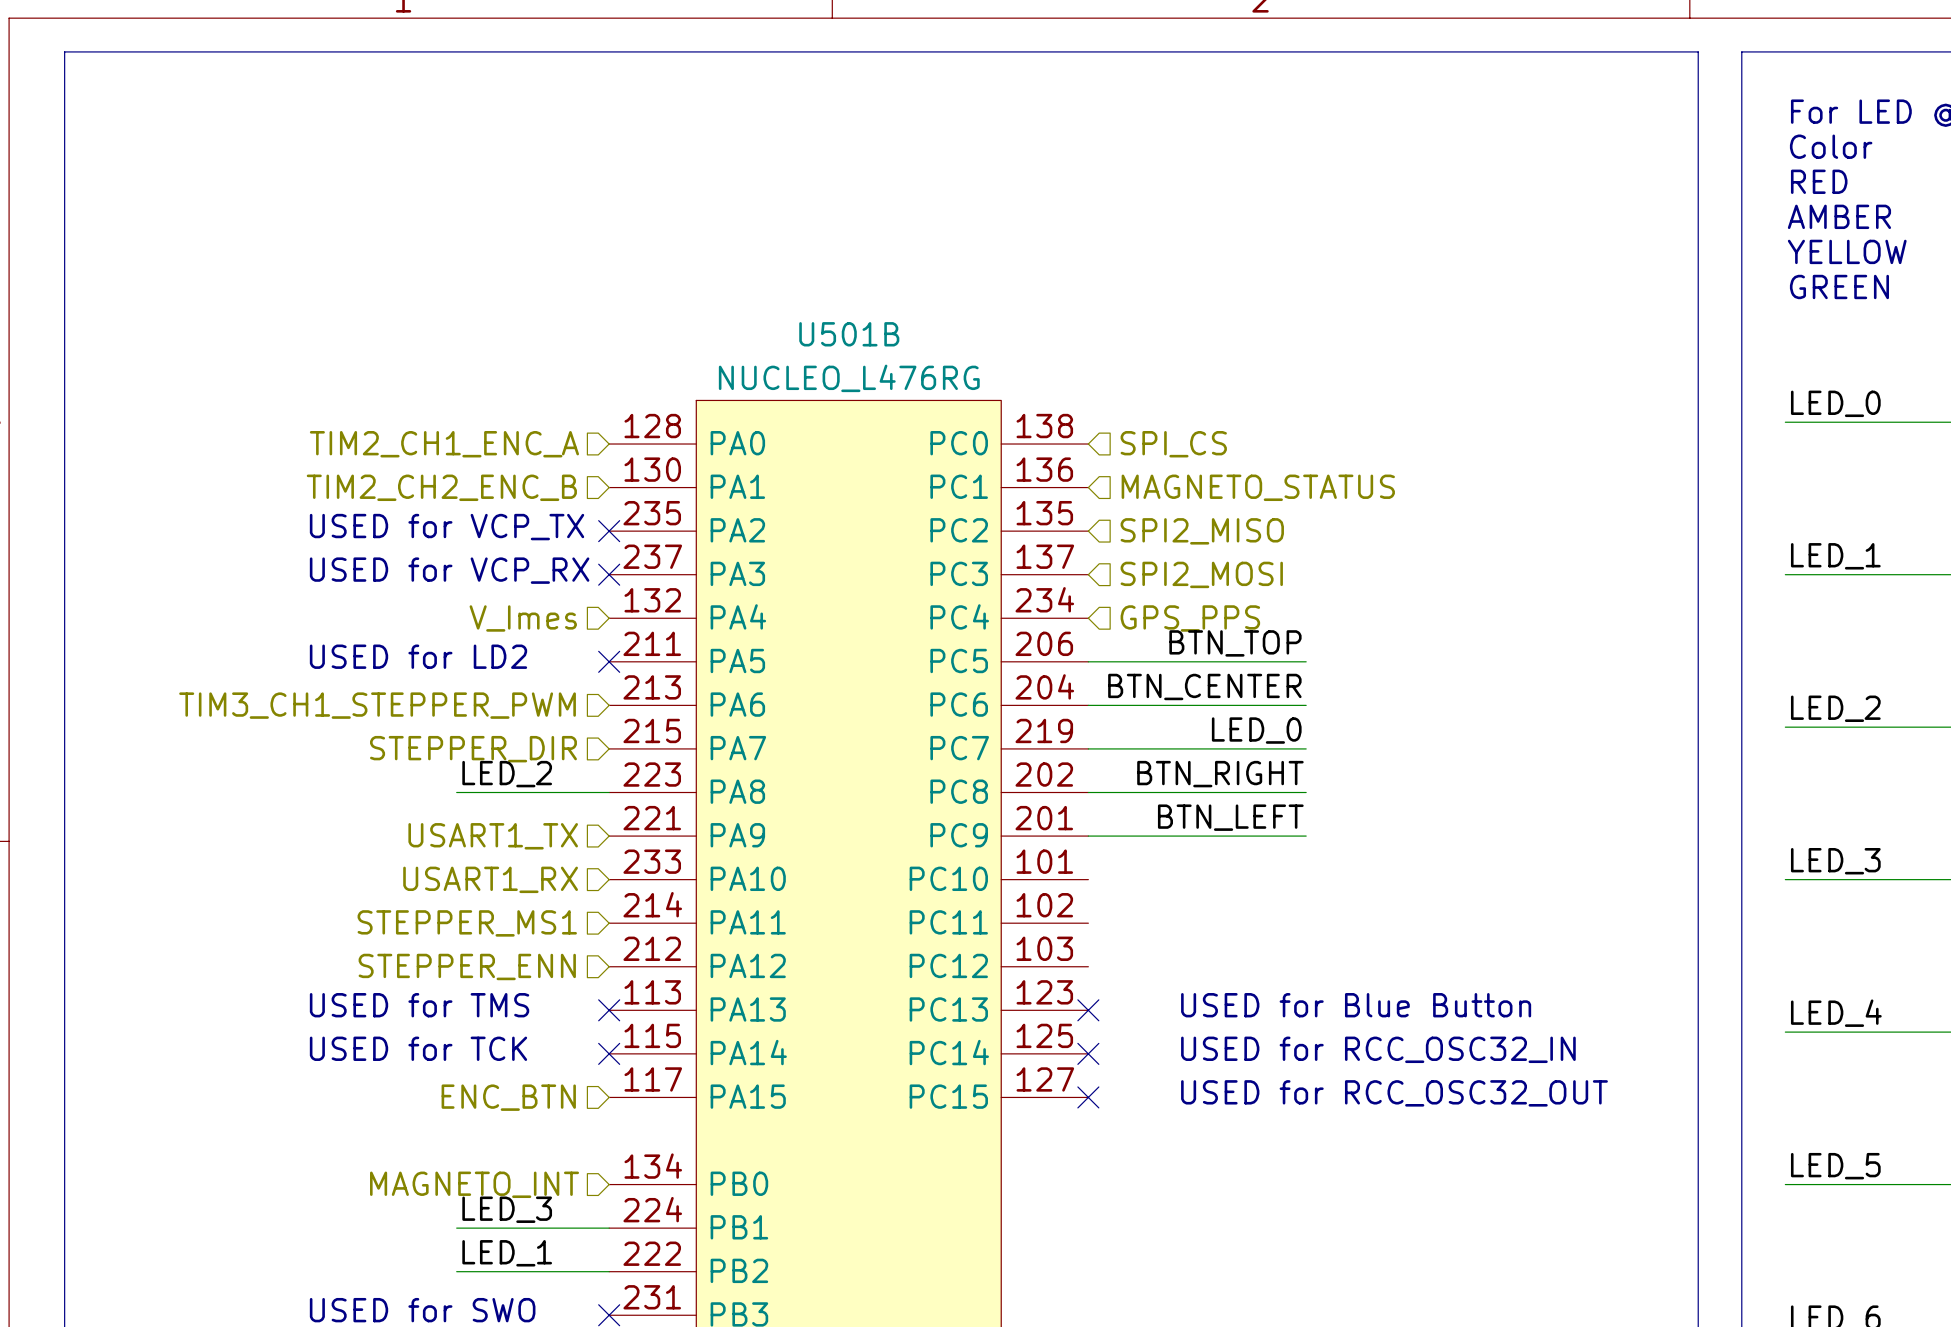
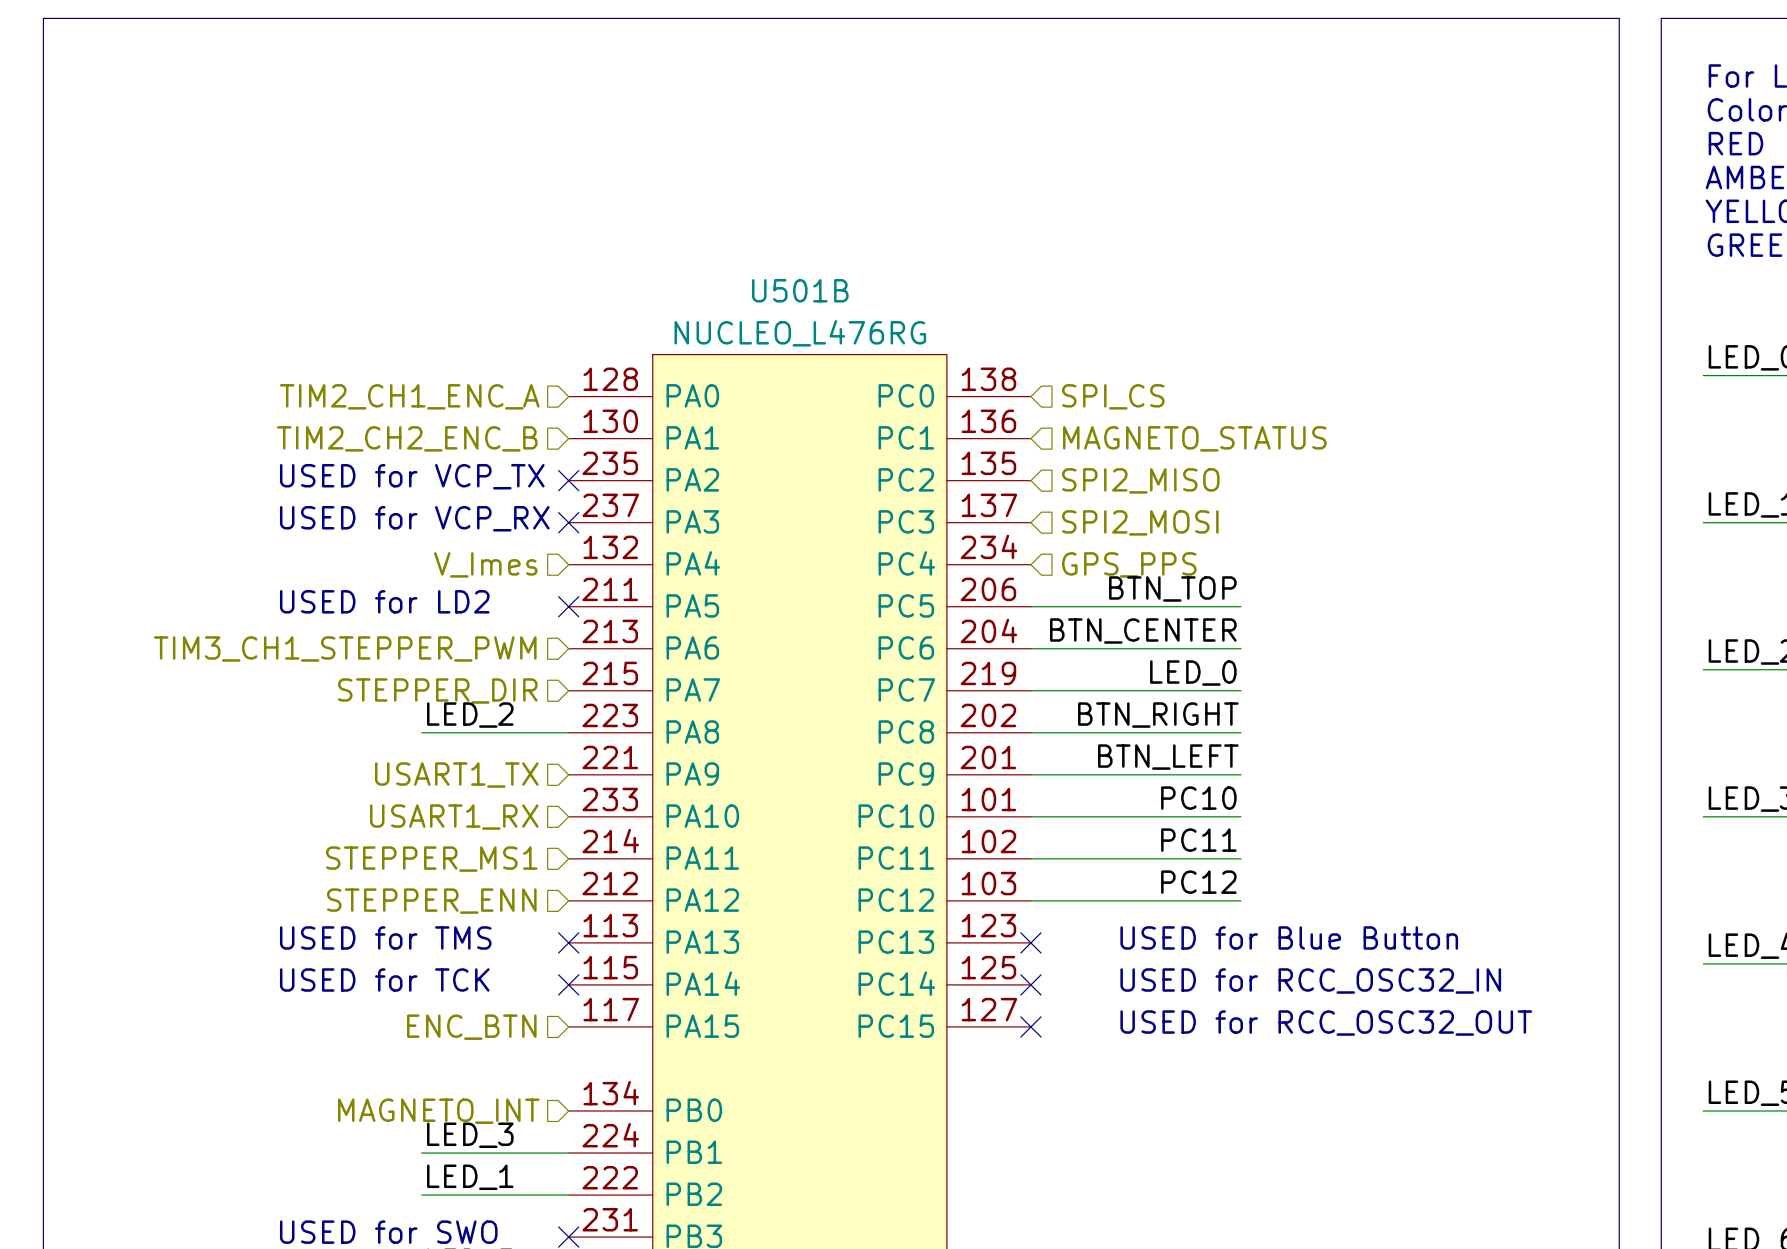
label: none -> PC10 (1198, 798)
wire: none -> (1030, 816) (1241, 816)
label: none -> PC11 (1198, 840)
wire: none -> (1030, 858) (1241, 858)
label: none -> PC12 (1198, 882)
wire: none -> (1030, 900) (1241, 900)

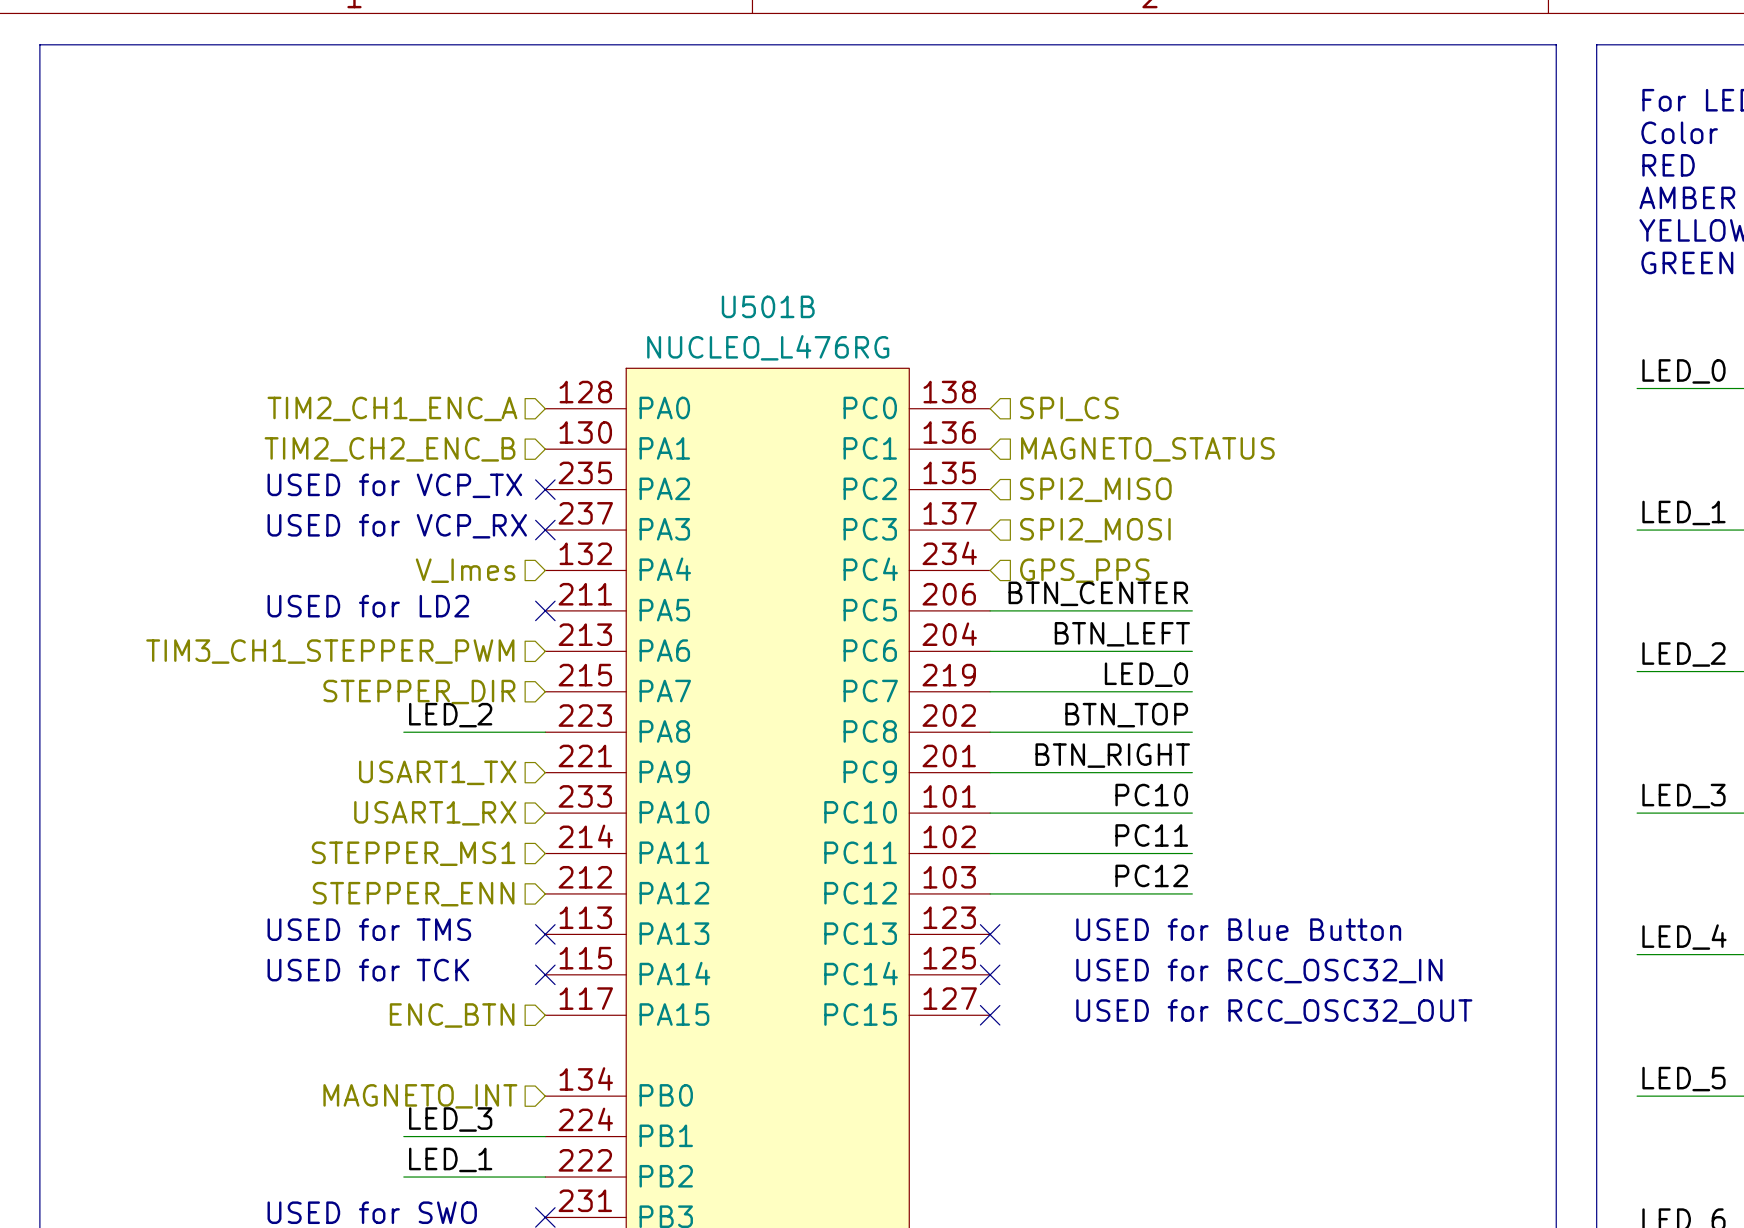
label: BTN_TOP (1172, 588) -> BTN_CENTER (1098, 593)
label: BTN_CENTER (1143, 631) -> BTN_LEFT (1122, 634)
label: BTN_RIGHT (1158, 715) -> BTN_TOP (1126, 715)
label: BTN_LEFT (1168, 757) -> BTN_RIGHT (1112, 755)

